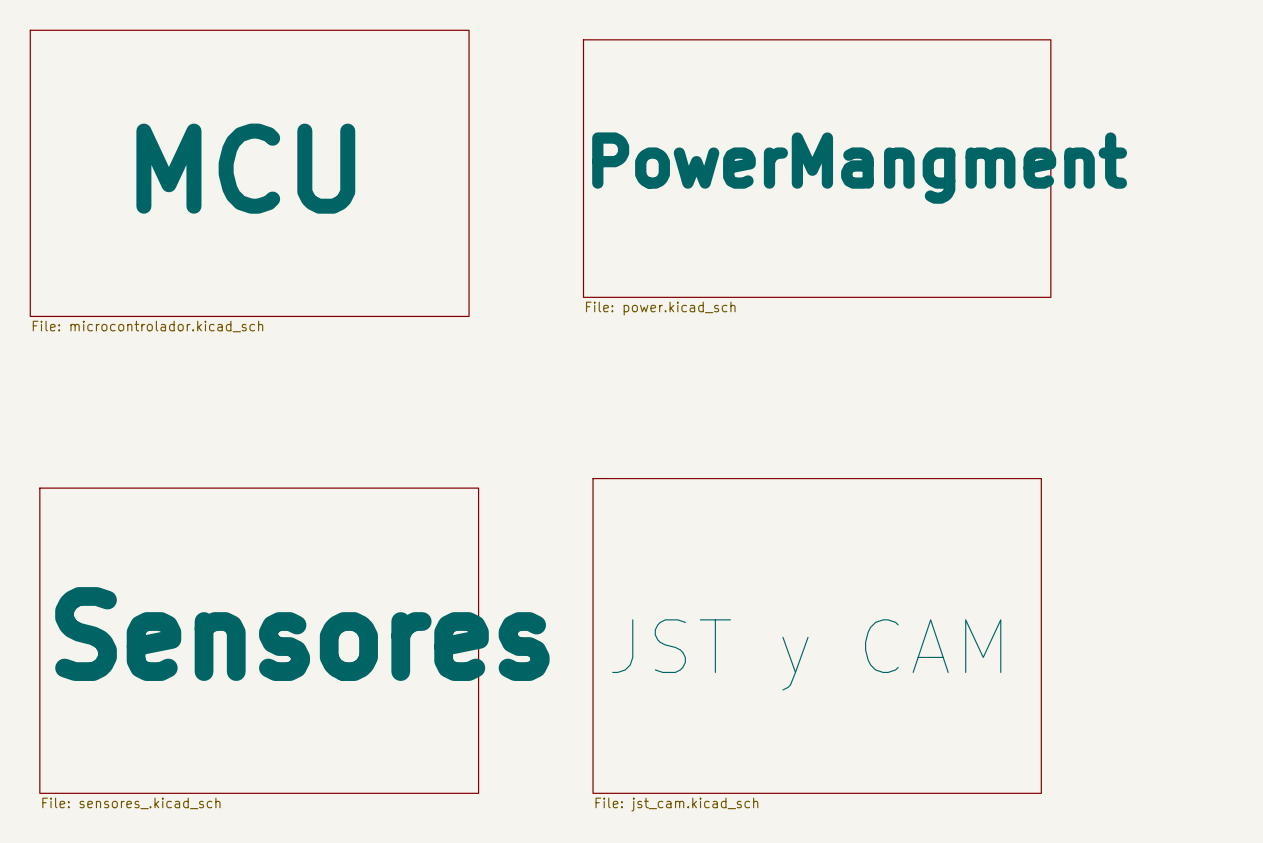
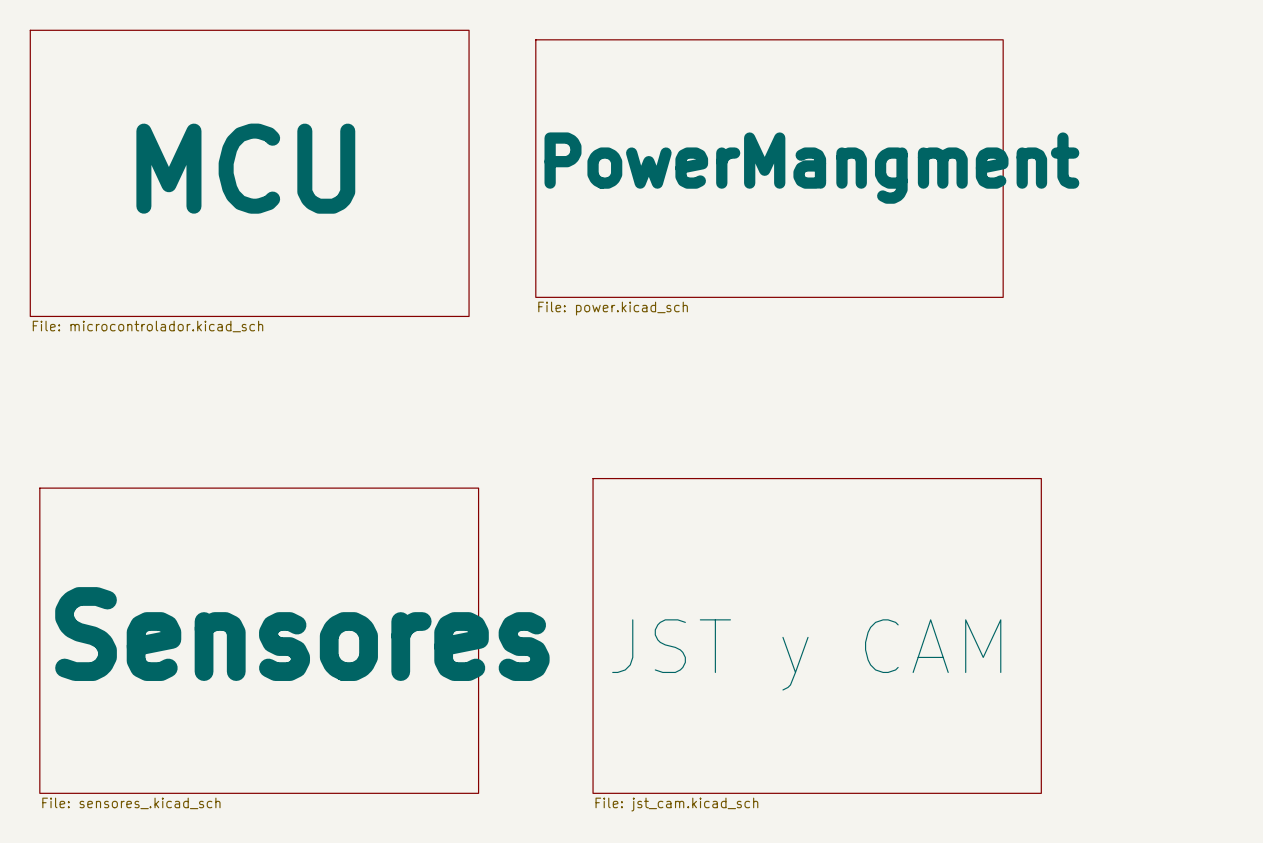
sheet PowerMangment position: (817, 168) -> (769, 168)

